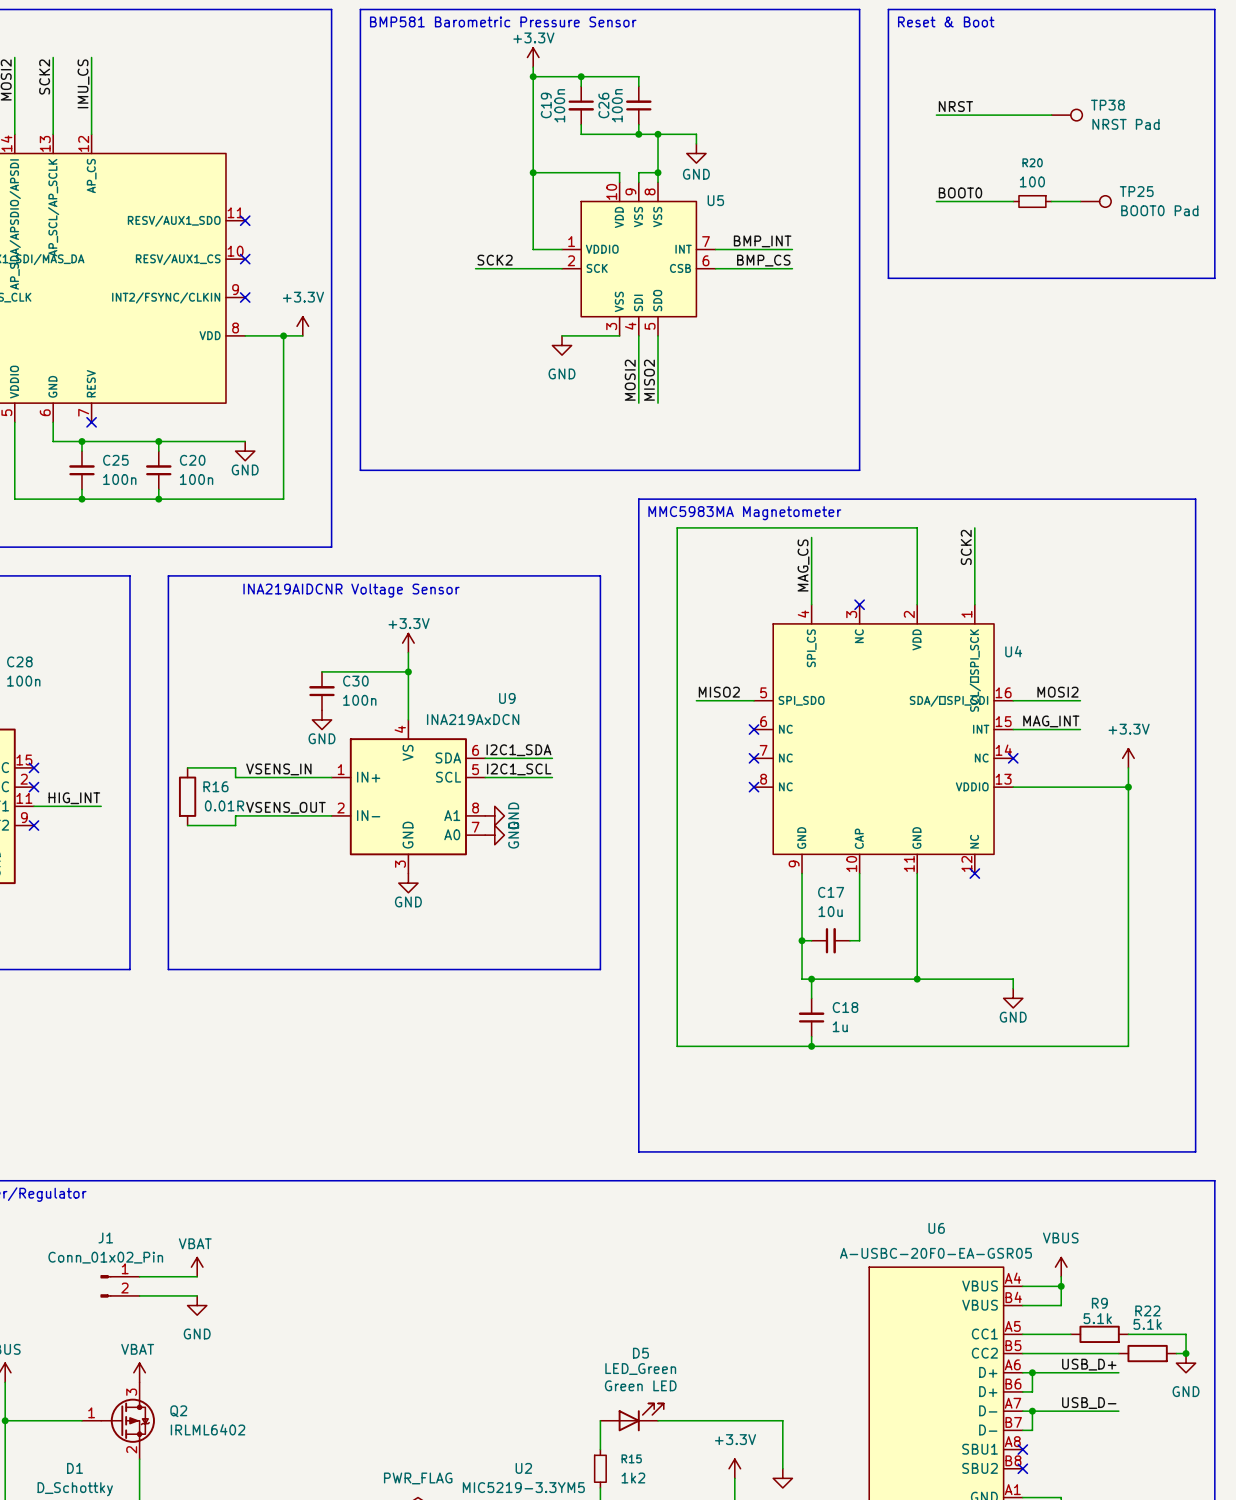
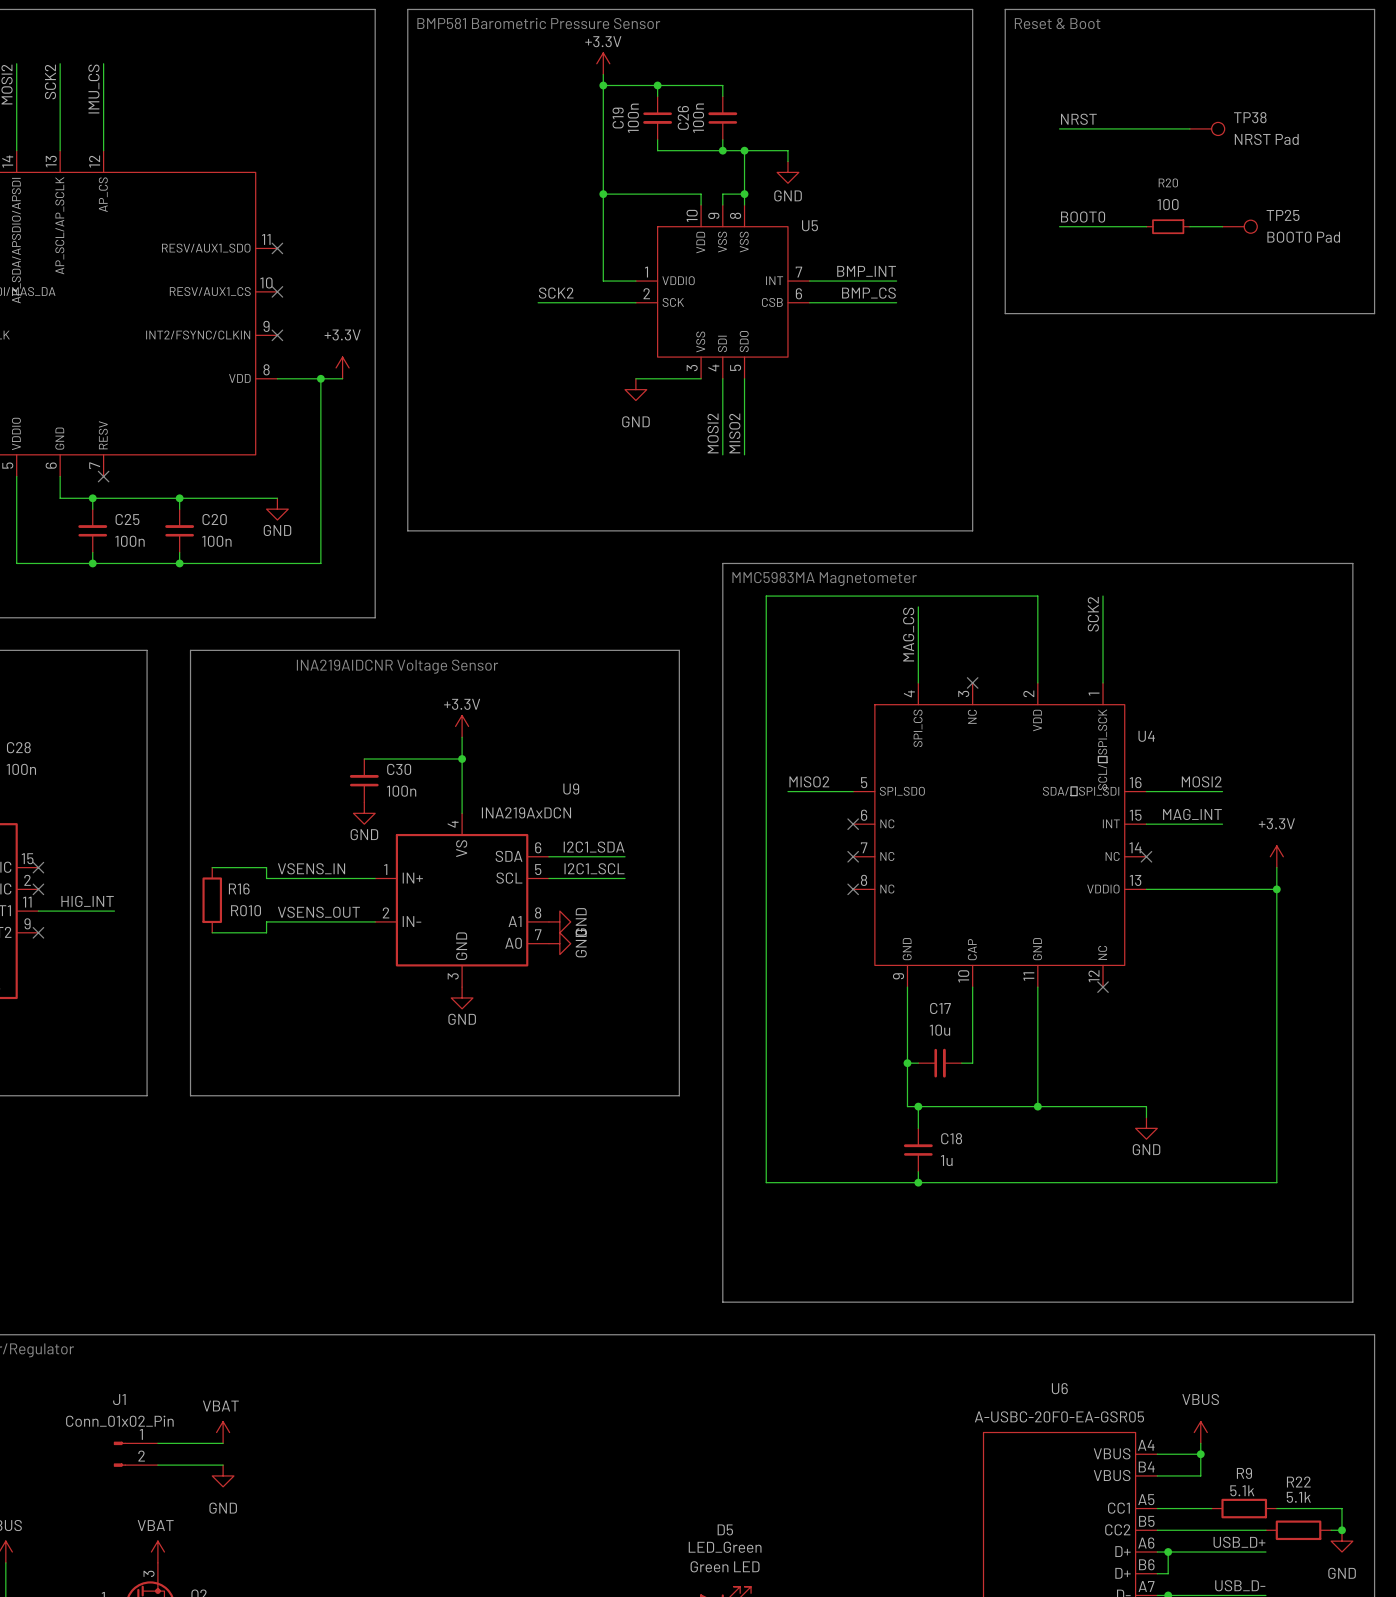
R16 value: 0.01R (224, 805) -> R010 (246, 910)

